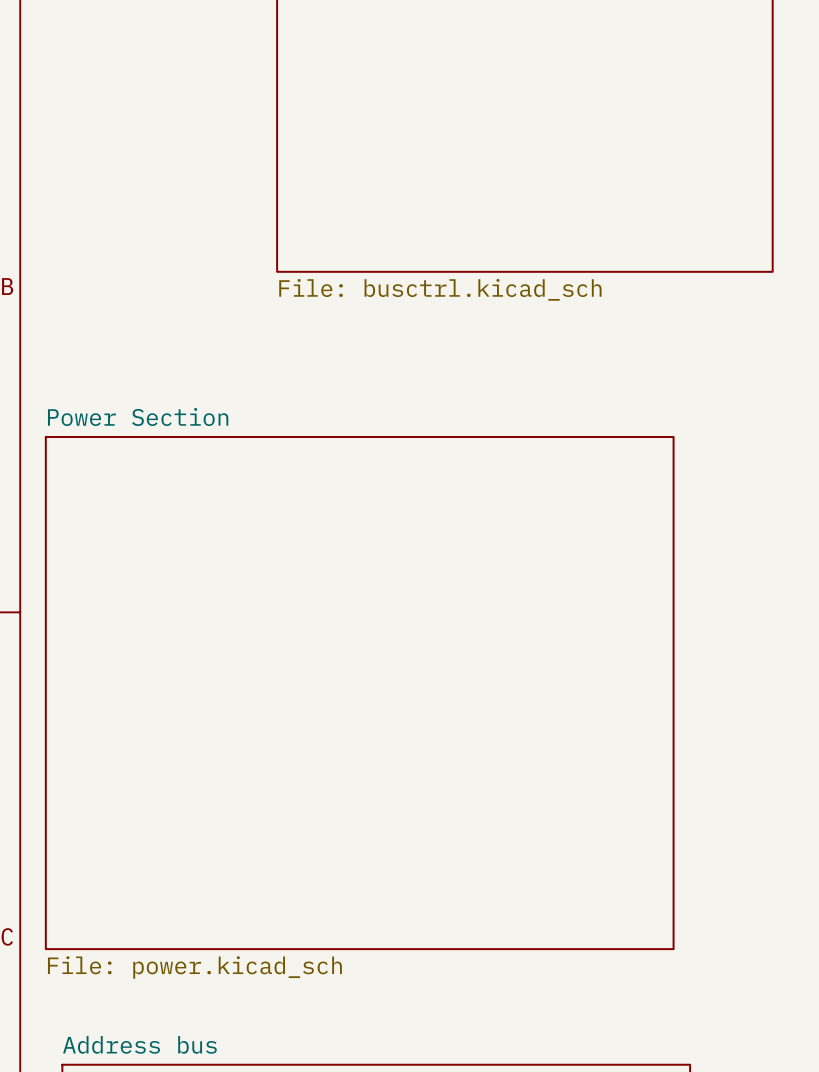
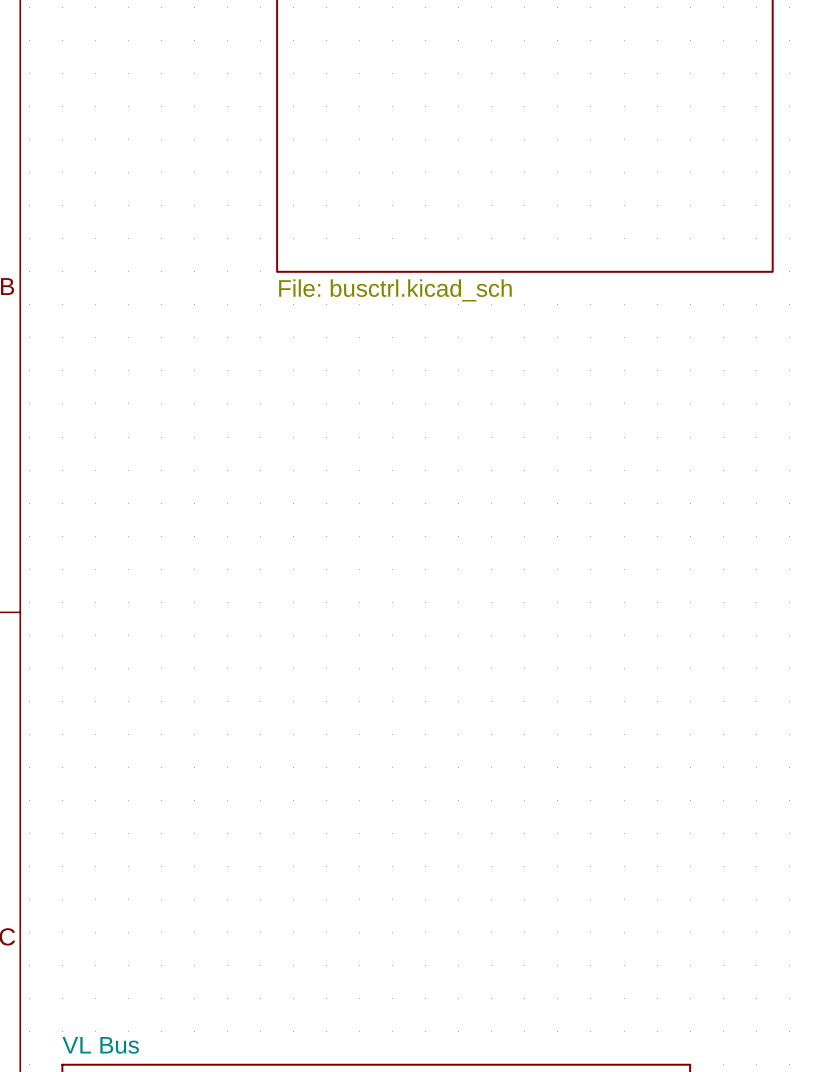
sheet Power Section: File: power.kicad_sch (359, 693) -> none
sheet Address bus name: Address bus (139, 1044) -> VL Bus (100, 1045)

